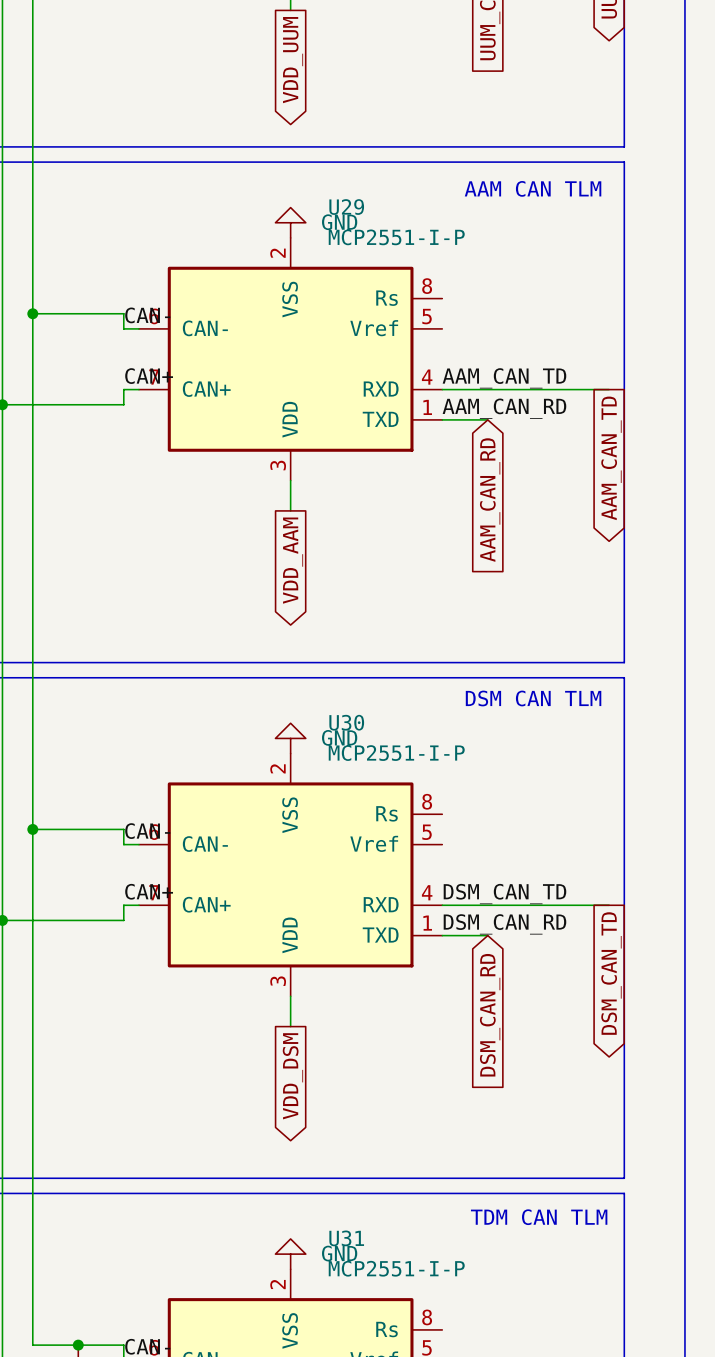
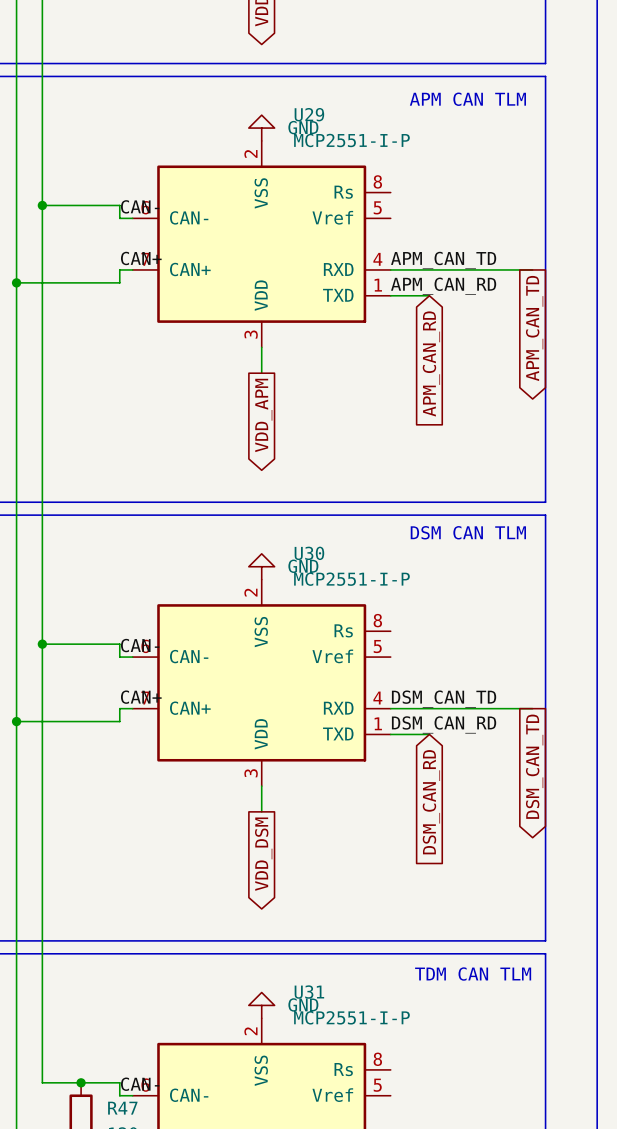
text: AAM CAN TLM (533, 188) -> APM CAN TLM (467, 99)
label: AAM_CAN_TD (504, 378) -> APM_CAN_TD (443, 260)
label: AAM_CAN_RD (504, 408) -> APM_CAN_RD (443, 286)
global label: AAM_CAN_TD (611, 458) -> APM_CAN_TD (534, 328)
global label: AAM_CAN_RD (490, 500) -> APM_CAN_RD (431, 363)
global label: VDD_AAM (293, 560) -> VDD_APM (263, 415)

